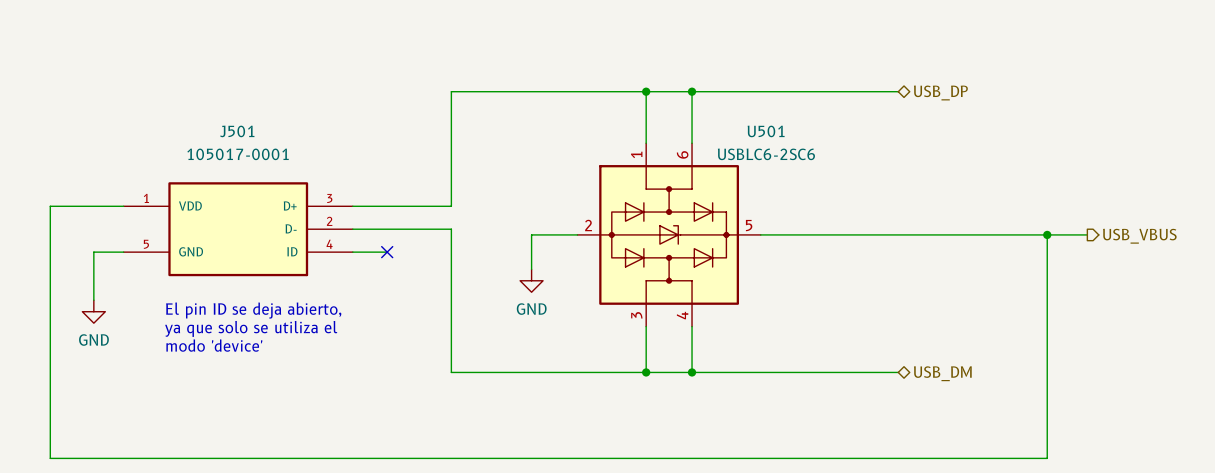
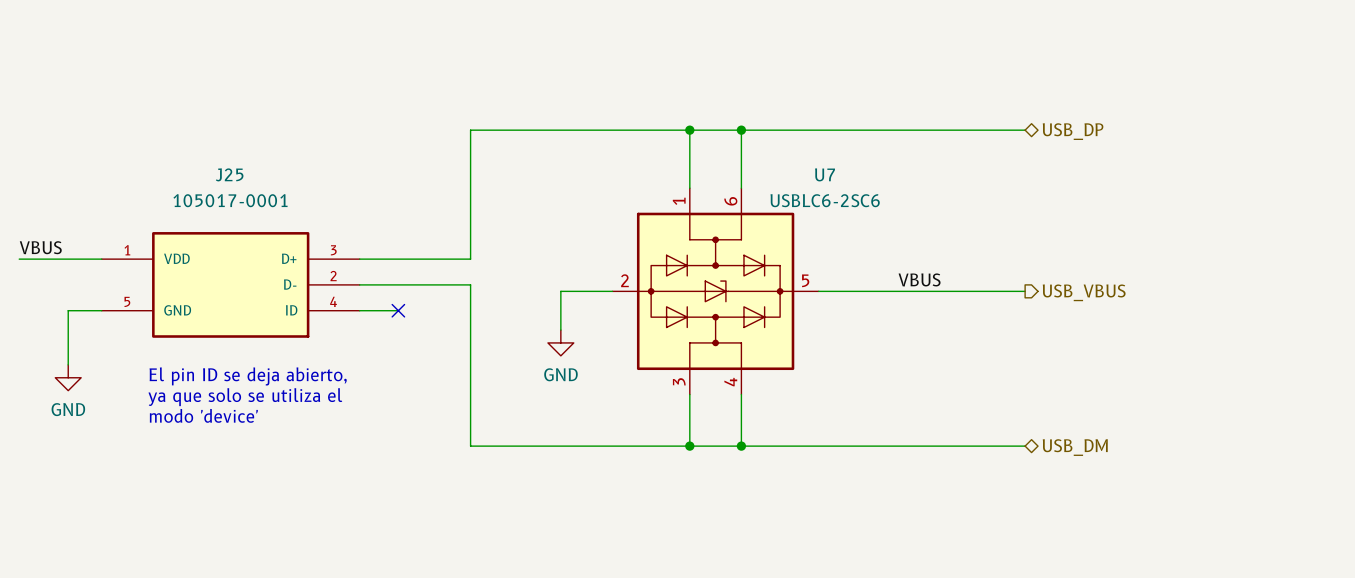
wire: none -> (973, 130) (1025, 130)
hierarchical label position: USB_DP (940, 92) -> USB_DP (1073, 131)
J501 name: J501 (237, 131) -> J25 (229, 174)
U501 name: U501 (766, 131) -> U7 (825, 174)
label: none -> VBUS (40, 247)
wire: (50, 206) (50, 458) (1047, 458) (1047, 234) -> none
label: none -> VBUS (919, 279)
wire: (944, 234) (1087, 234) -> none
junction: (1047, 234) -> none
hierarchical label position: USB_VBUS (1139, 236) -> USB_VBUS (1084, 292)
wire: none -> (973, 446) (1025, 446)
hierarchical label position: USB_DM (942, 373) -> USB_DM (1075, 447)

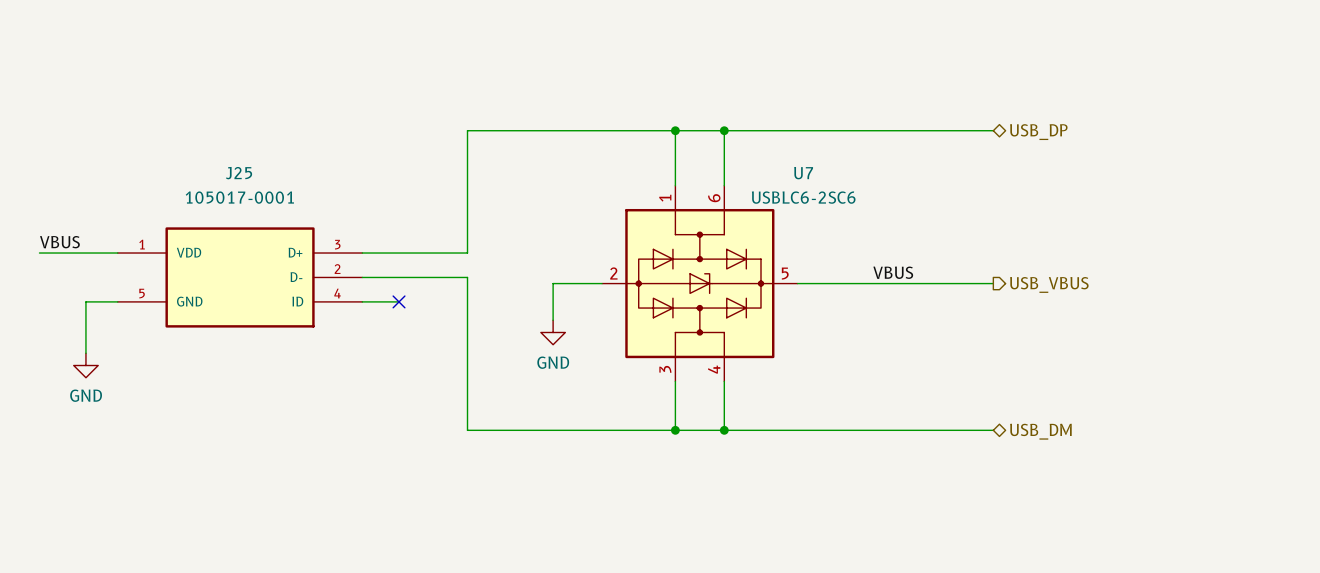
text: El pin ID se deja abierto, (248, 376) -> none
text: ya que solo se utiliza el (245, 397) -> none
text: modo 'device' (203, 415) -> none

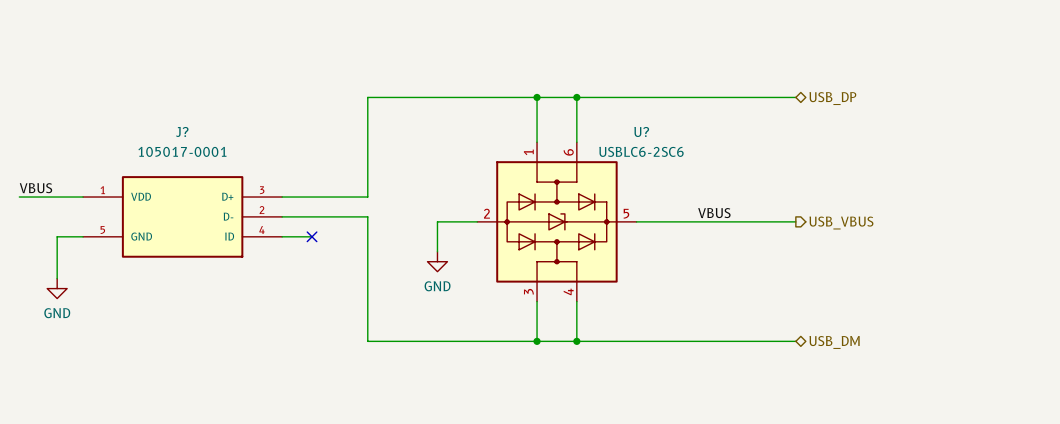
J25 name: J25 (239, 173) -> J? (182, 131)
U7 name: U7 (803, 173) -> U? (641, 131)

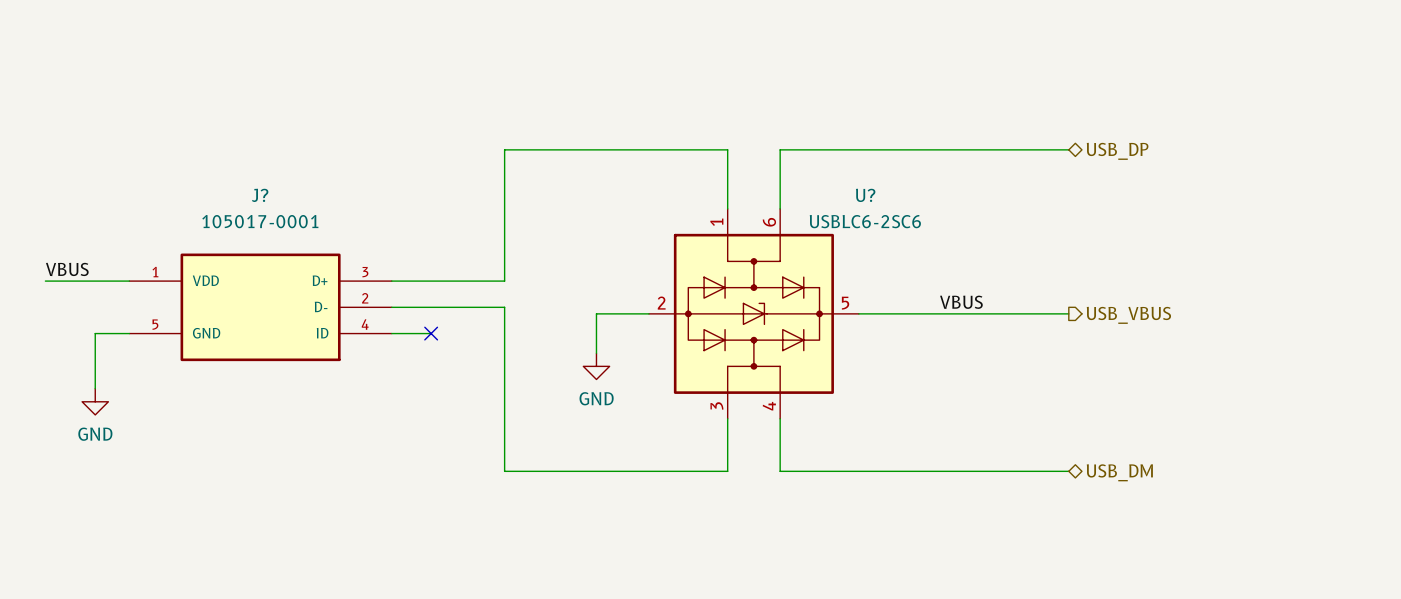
wire: (537, 97) (576, 97) -> none
junction: (537, 97) -> none
junction: (576, 97) -> none
wire: (537, 341) (576, 341) -> none
junction: (537, 341) -> none
junction: (576, 341) -> none

